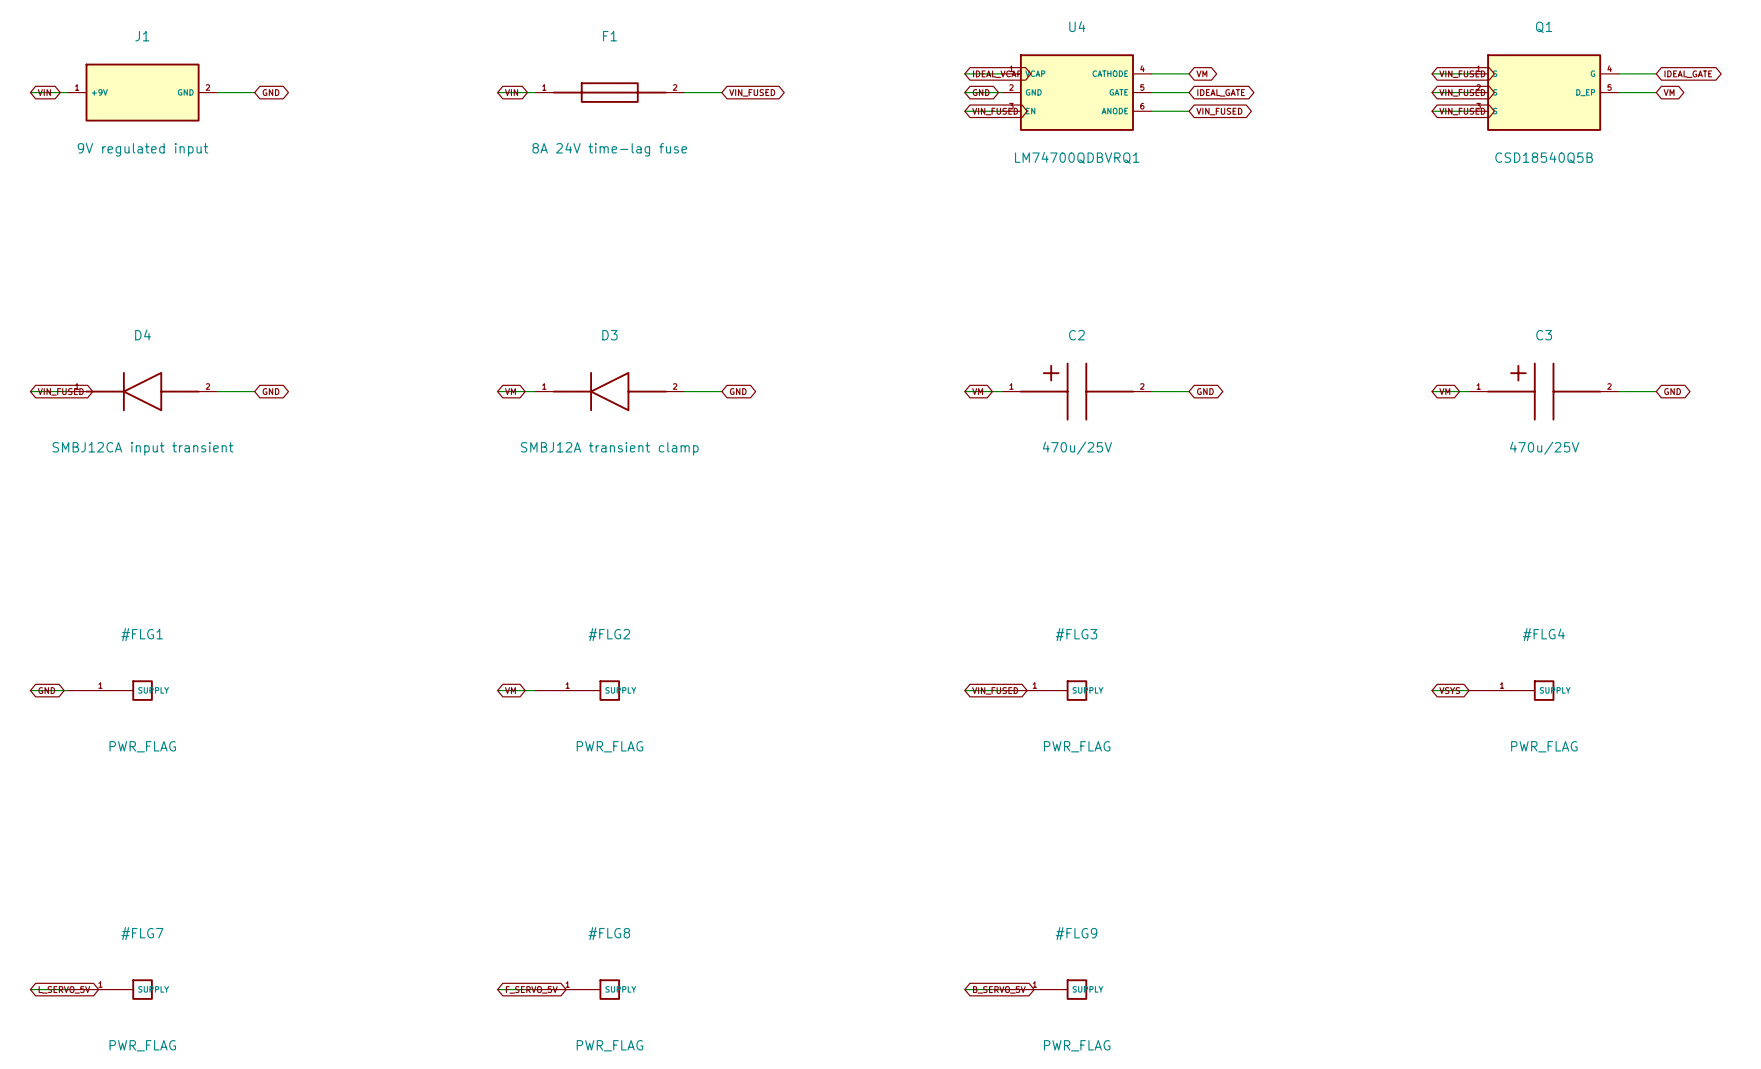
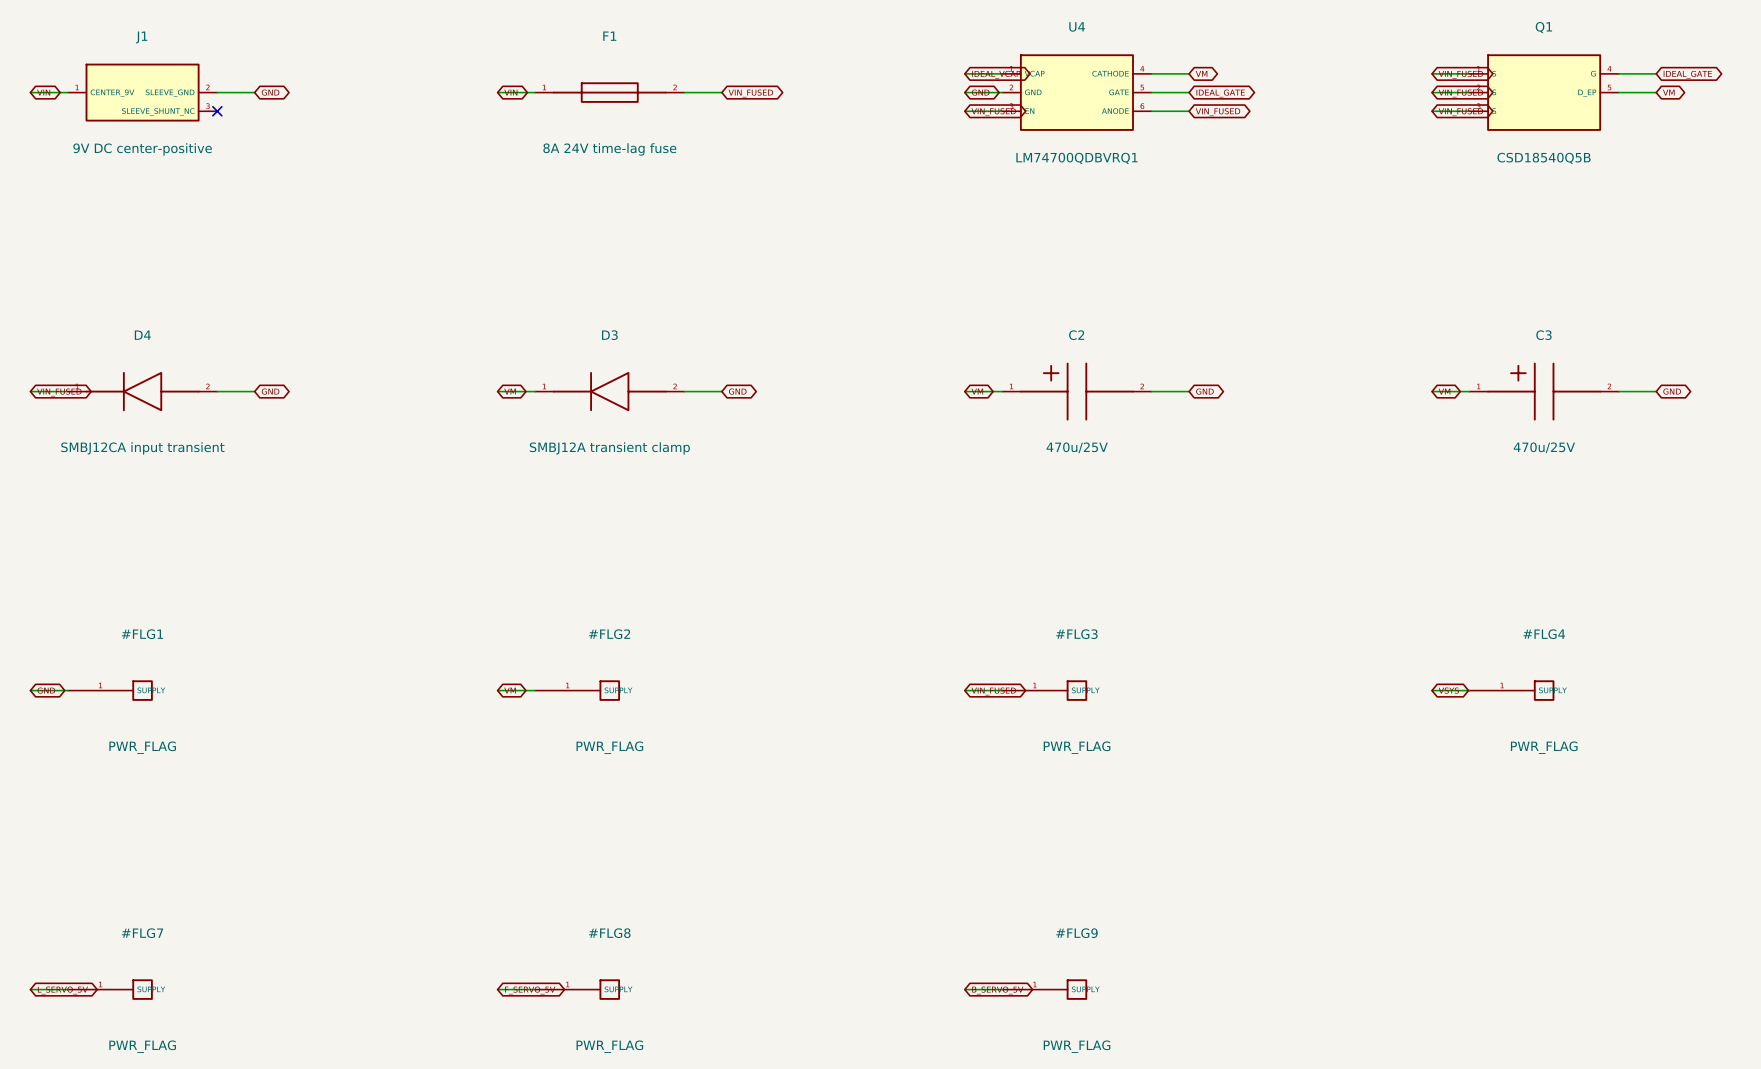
J1 symbol: [67, 63, 218, 122] -> [67, 63, 218, 122]
no-connect mark: none -> (217, 111)
J1 value: 9V regulated input (143, 149) -> 9V DC center-positive (142, 149)

